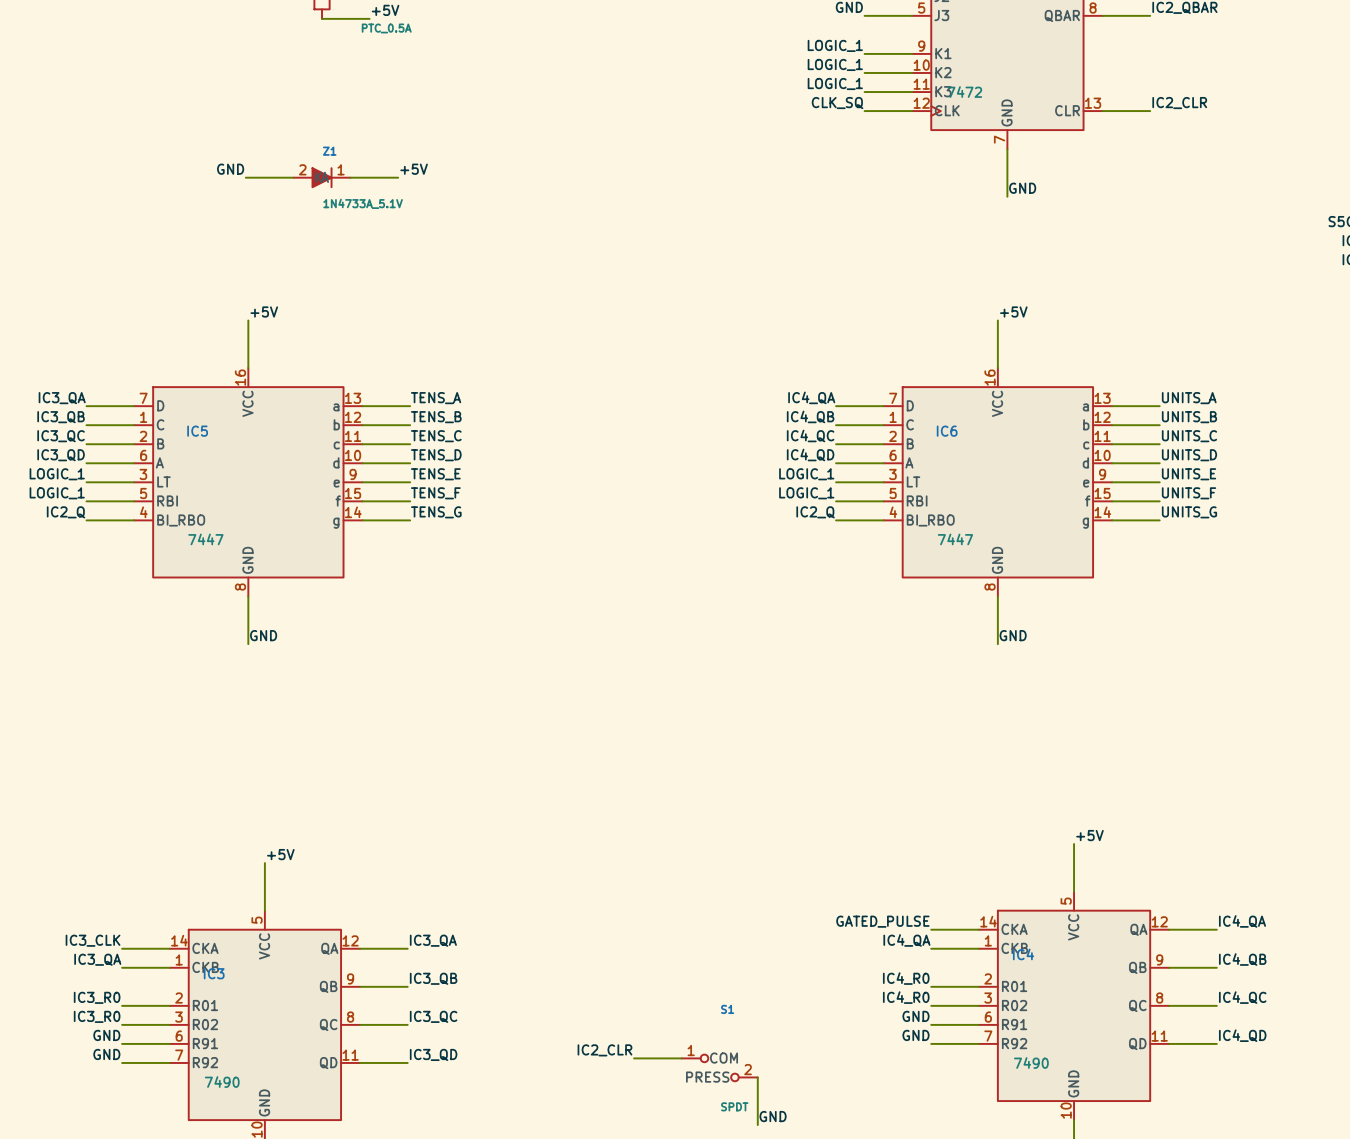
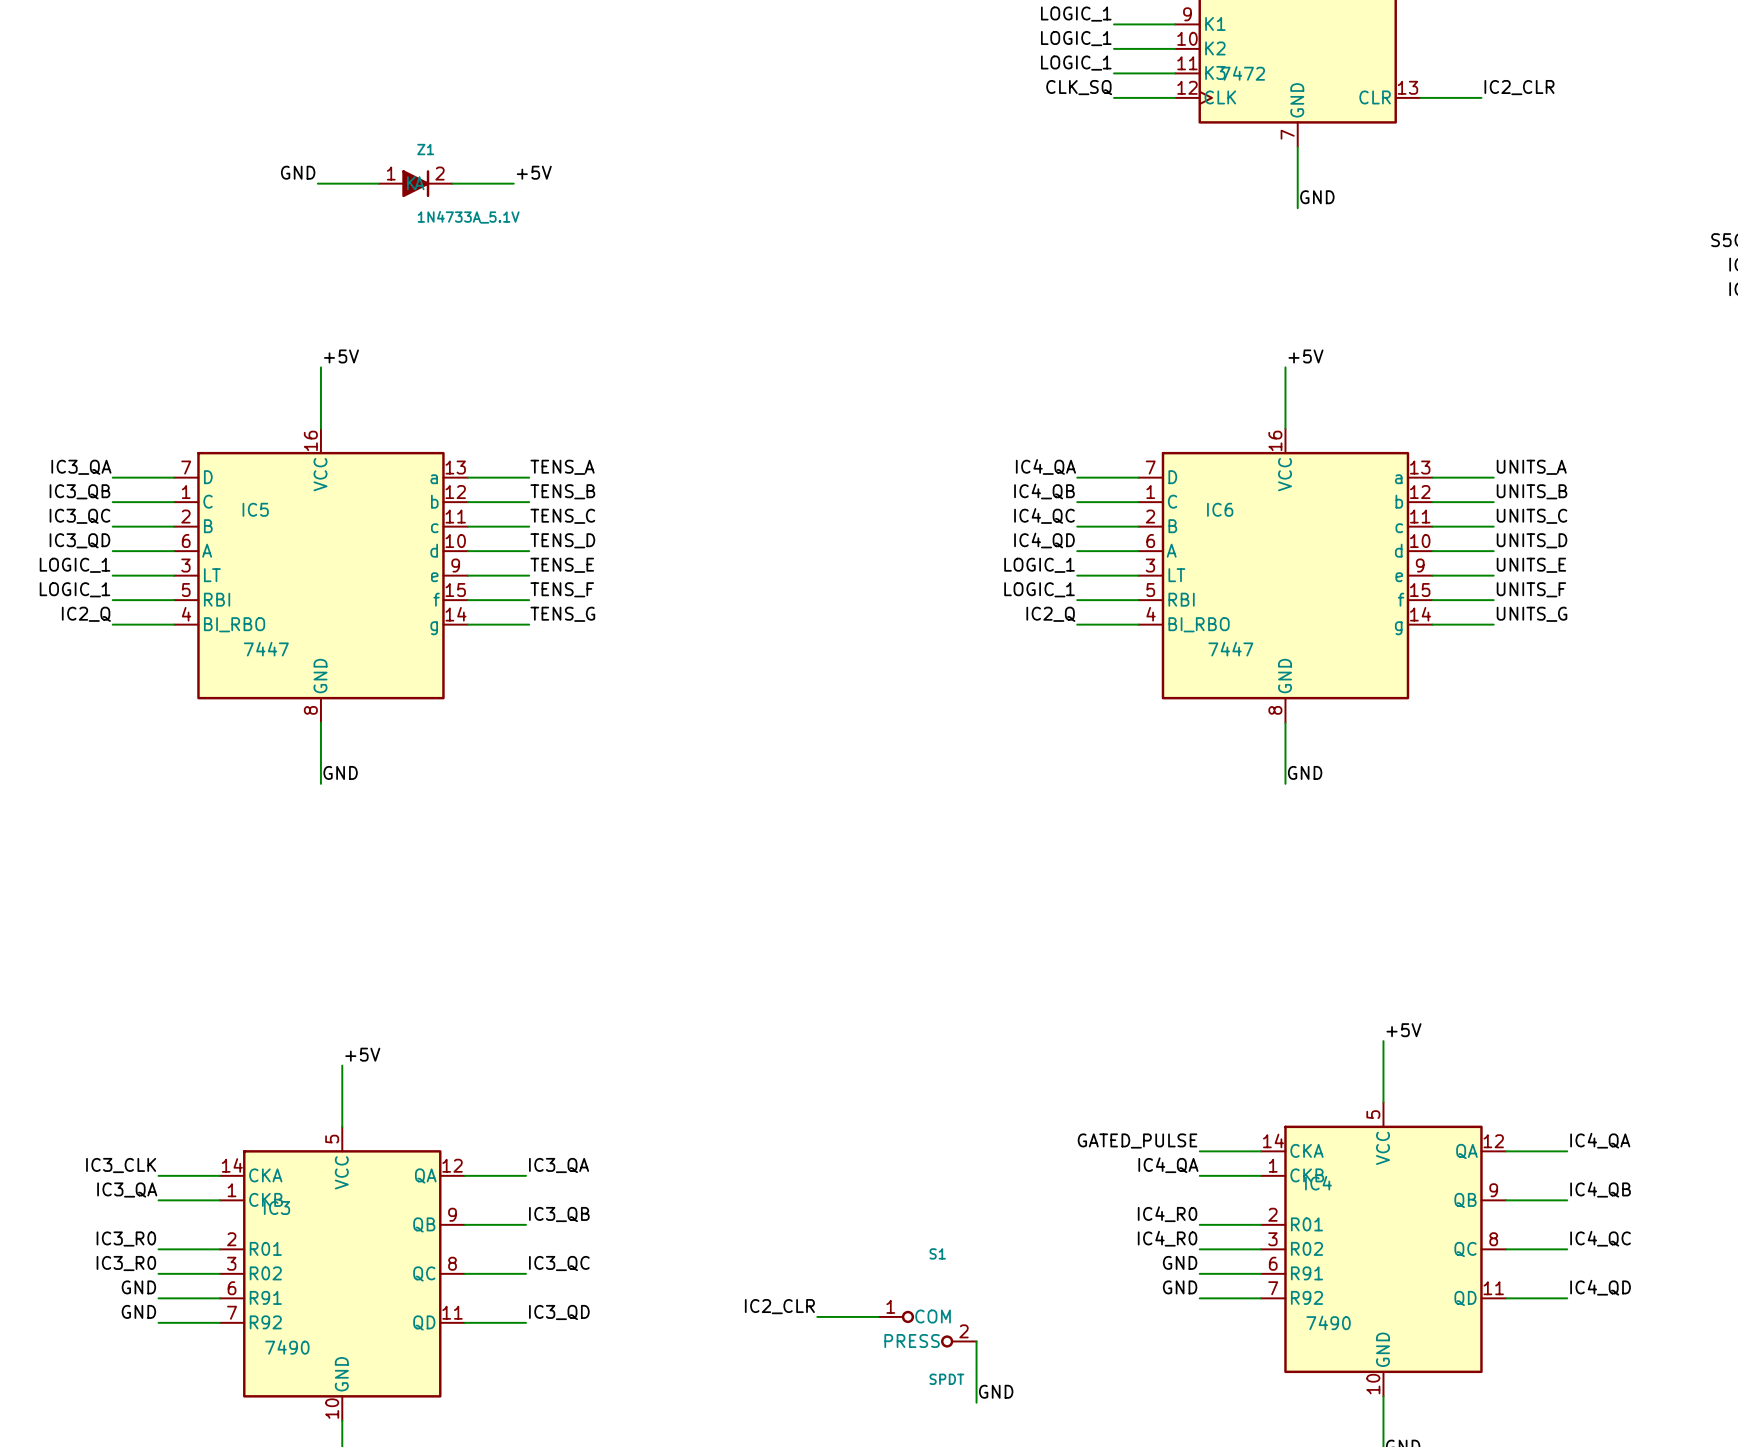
Z1 pin number: 2 (302, 169) -> 1 (391, 173)
Z1 pin number: 1 (341, 169) -> 2 (439, 173)

